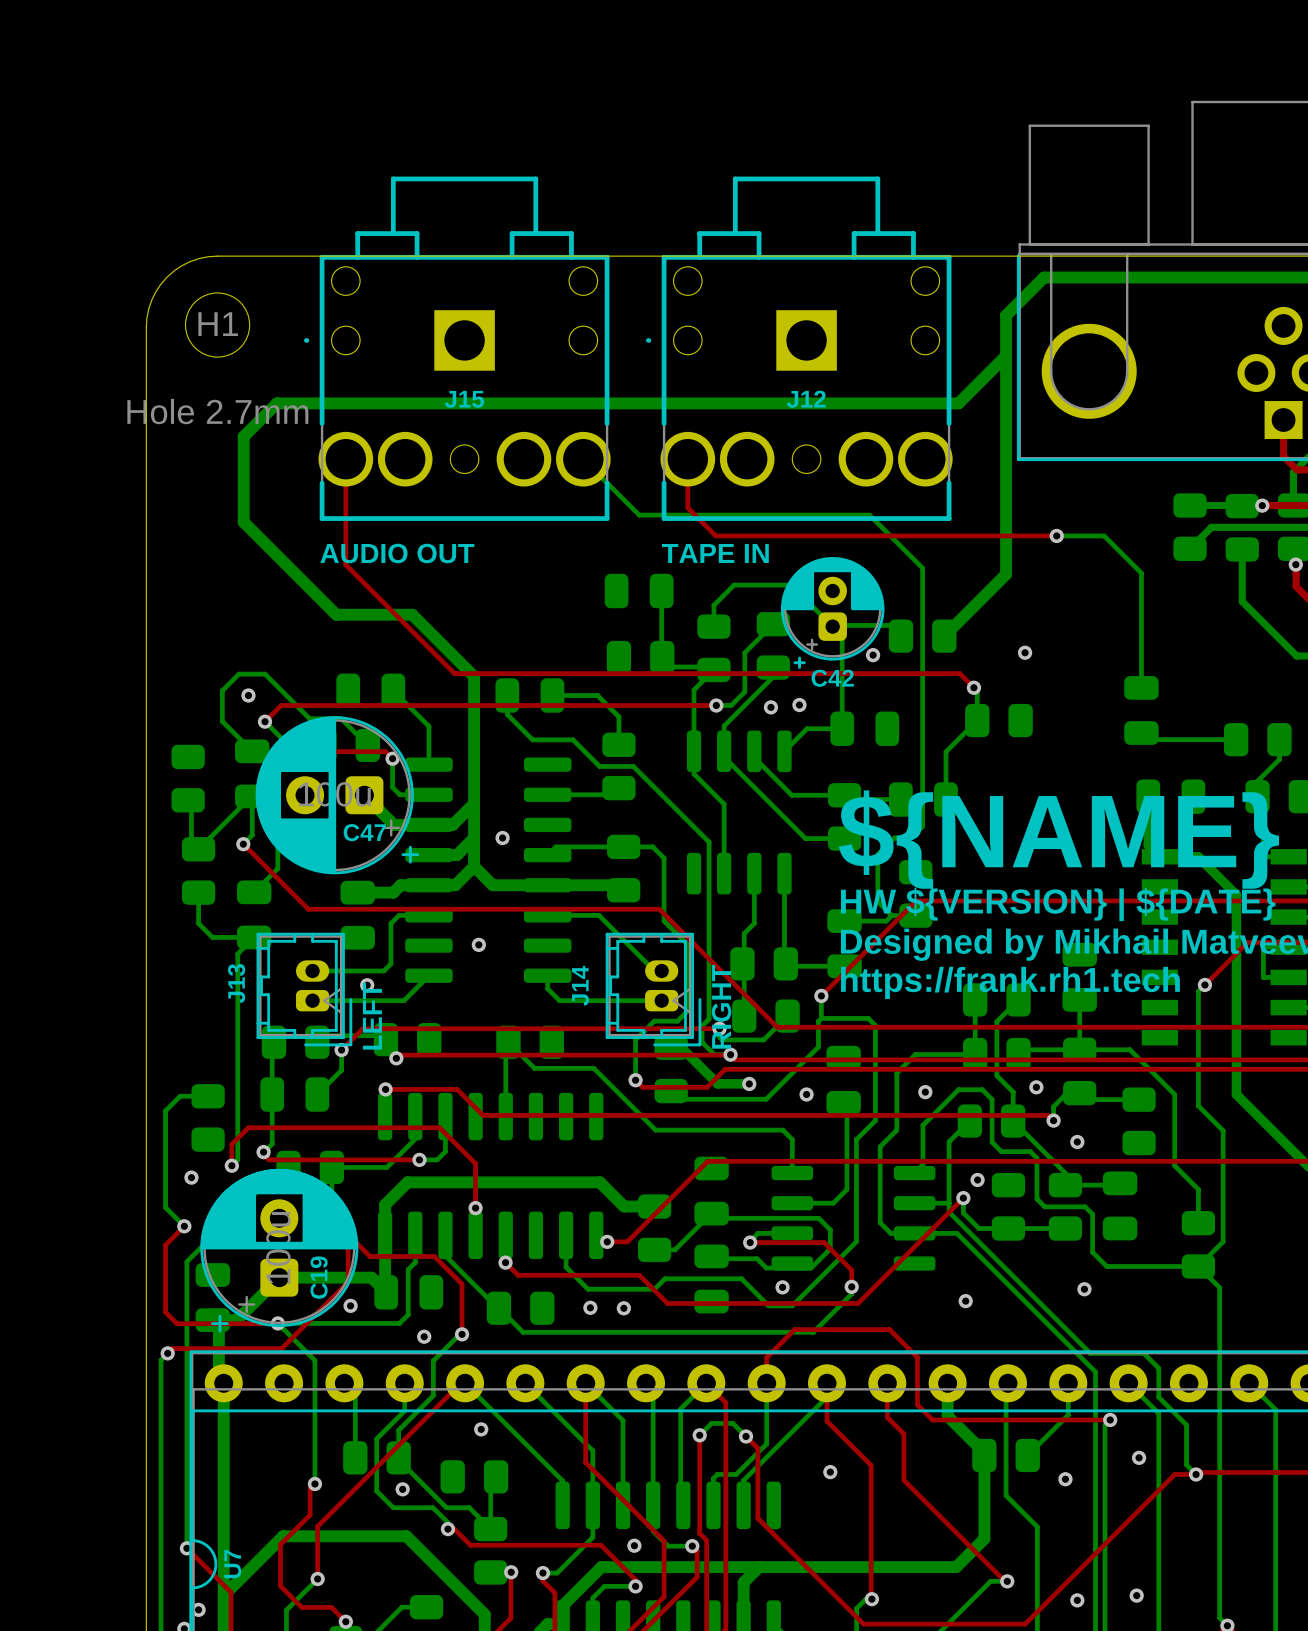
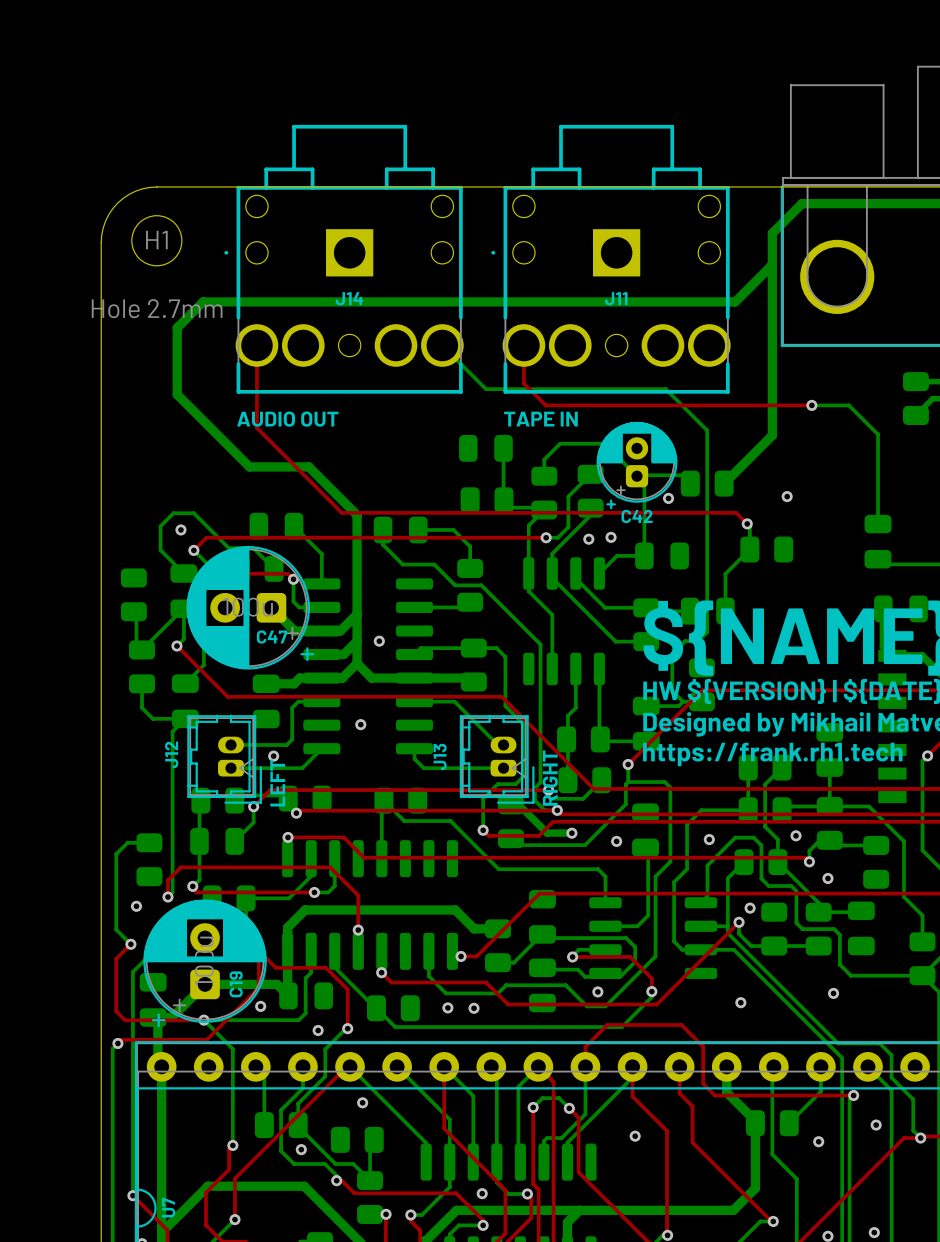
J15 name: J15 (464, 399) -> J14 (349, 298)
J12 name: J12 (806, 399) -> J11 (616, 298)
J13 name: J13 (236, 983) -> J12 (171, 754)
J14 name: J14 (580, 985) -> J13 (440, 756)

